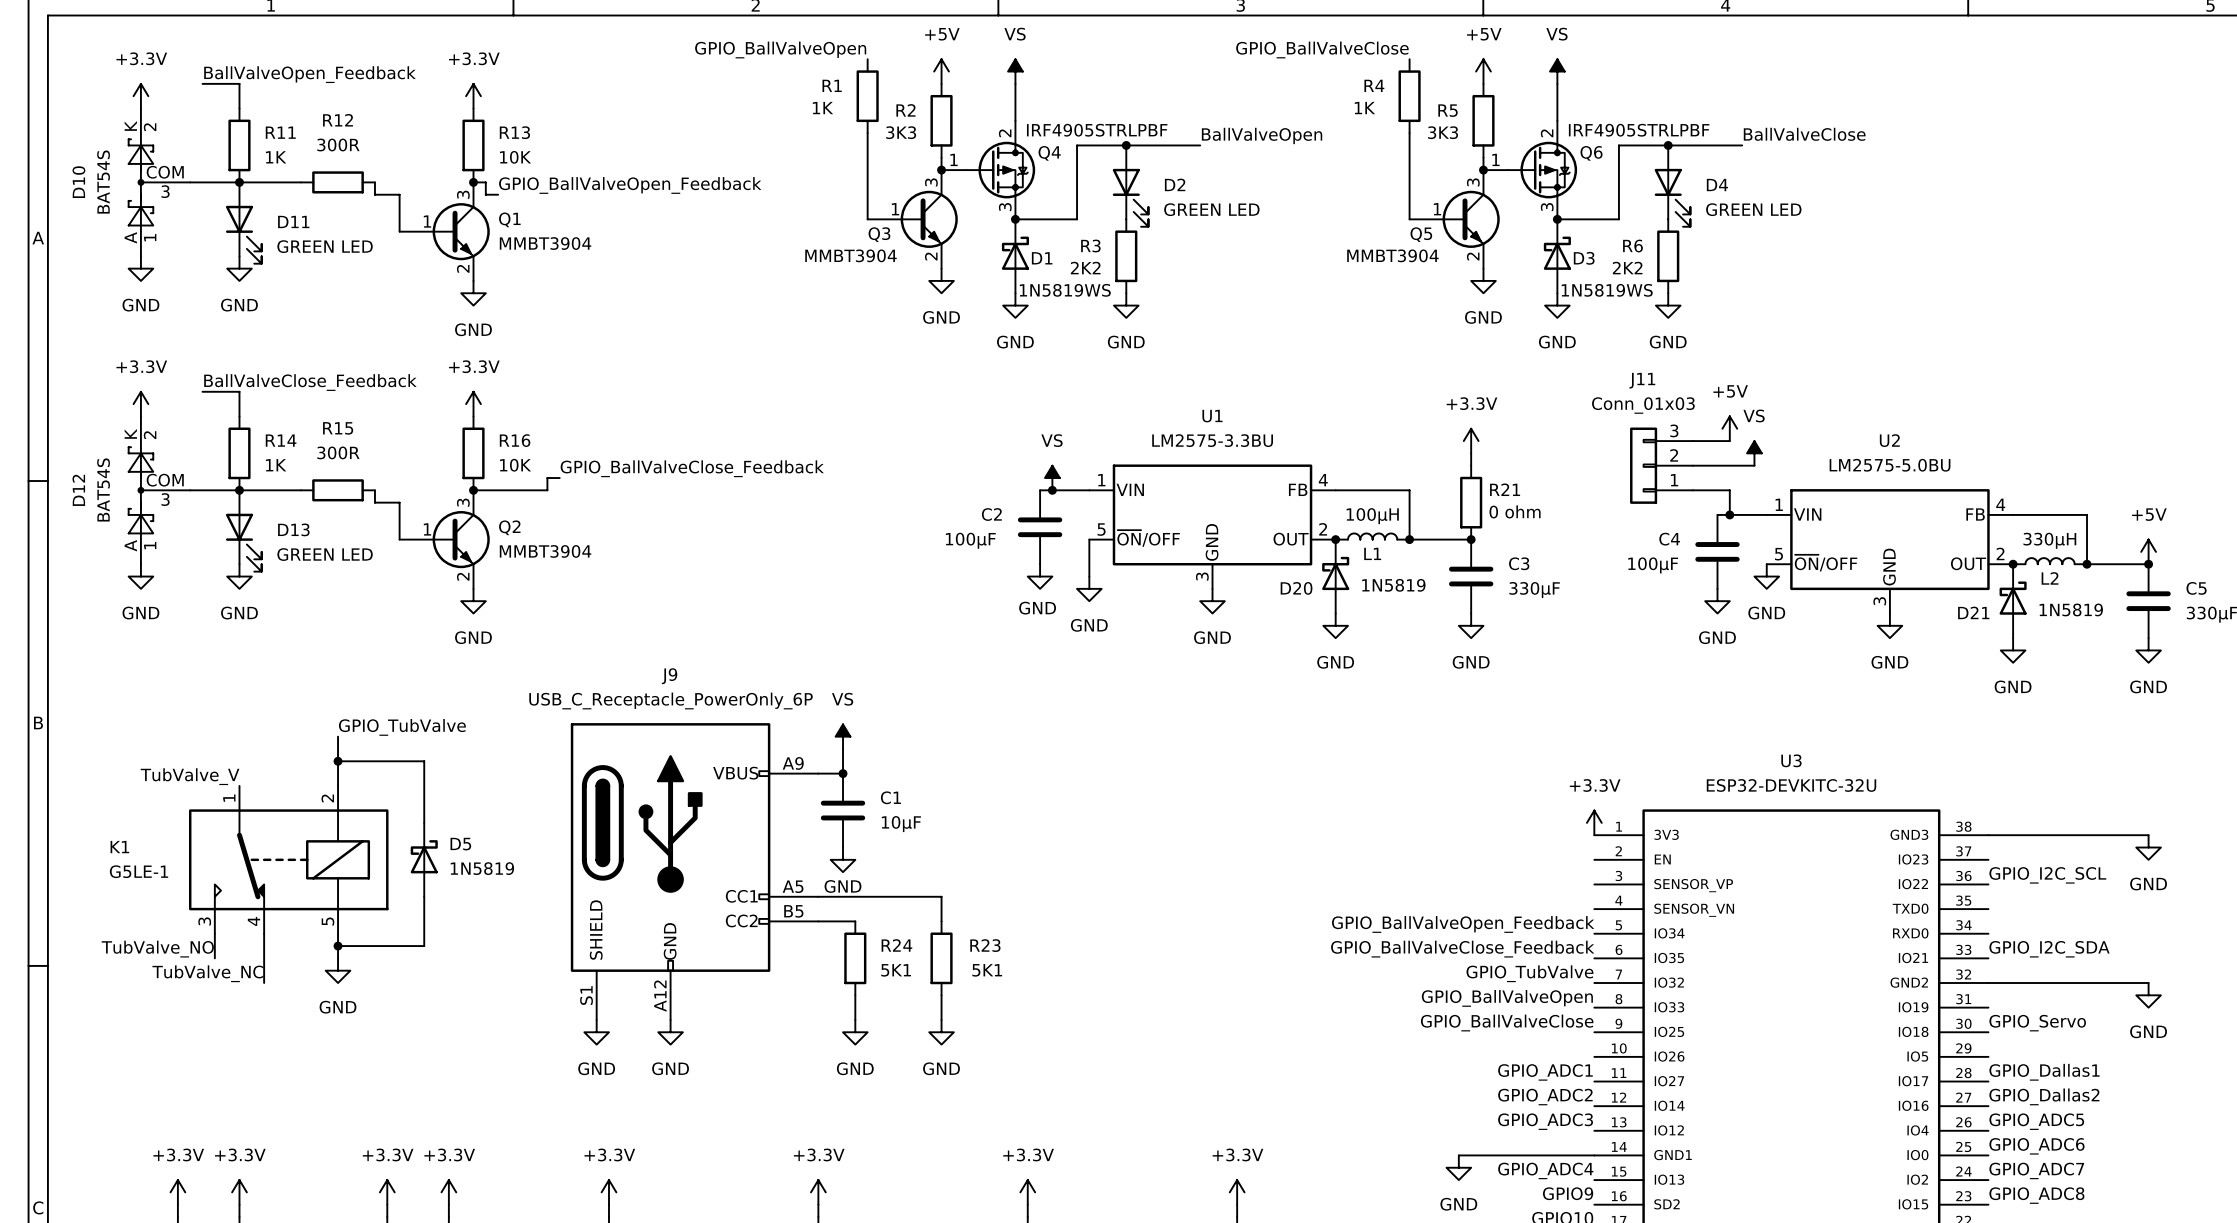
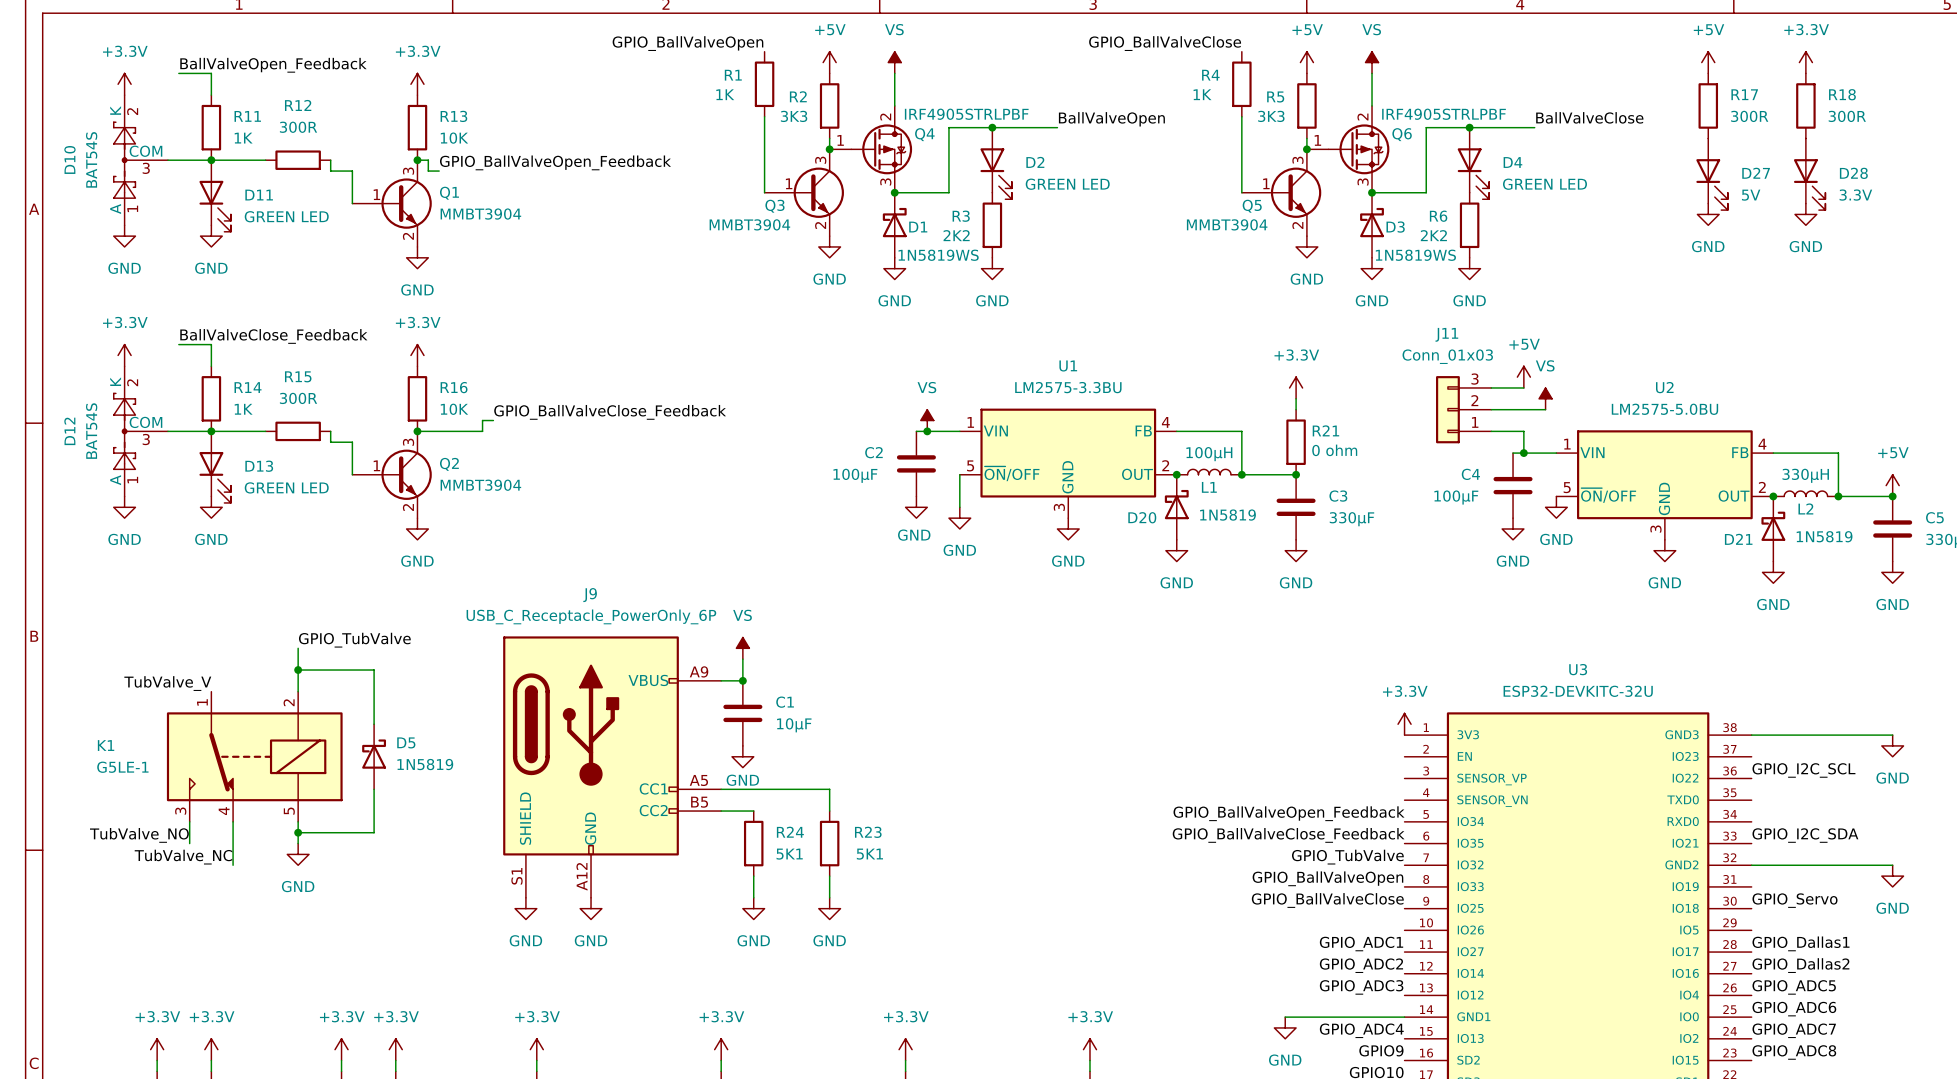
power symbol: none -> +5V (1708, 62)
power symbol: none -> +3.3V (1805, 62)
R17: none -> 300R (1708, 105)
R18: none -> 300R (1805, 105)
D27: none -> 5V (1712, 174)
D28: none -> 3.3V (1809, 174)
power symbol: none -> GND (1708, 214)
power symbol: none -> GND (1805, 214)

